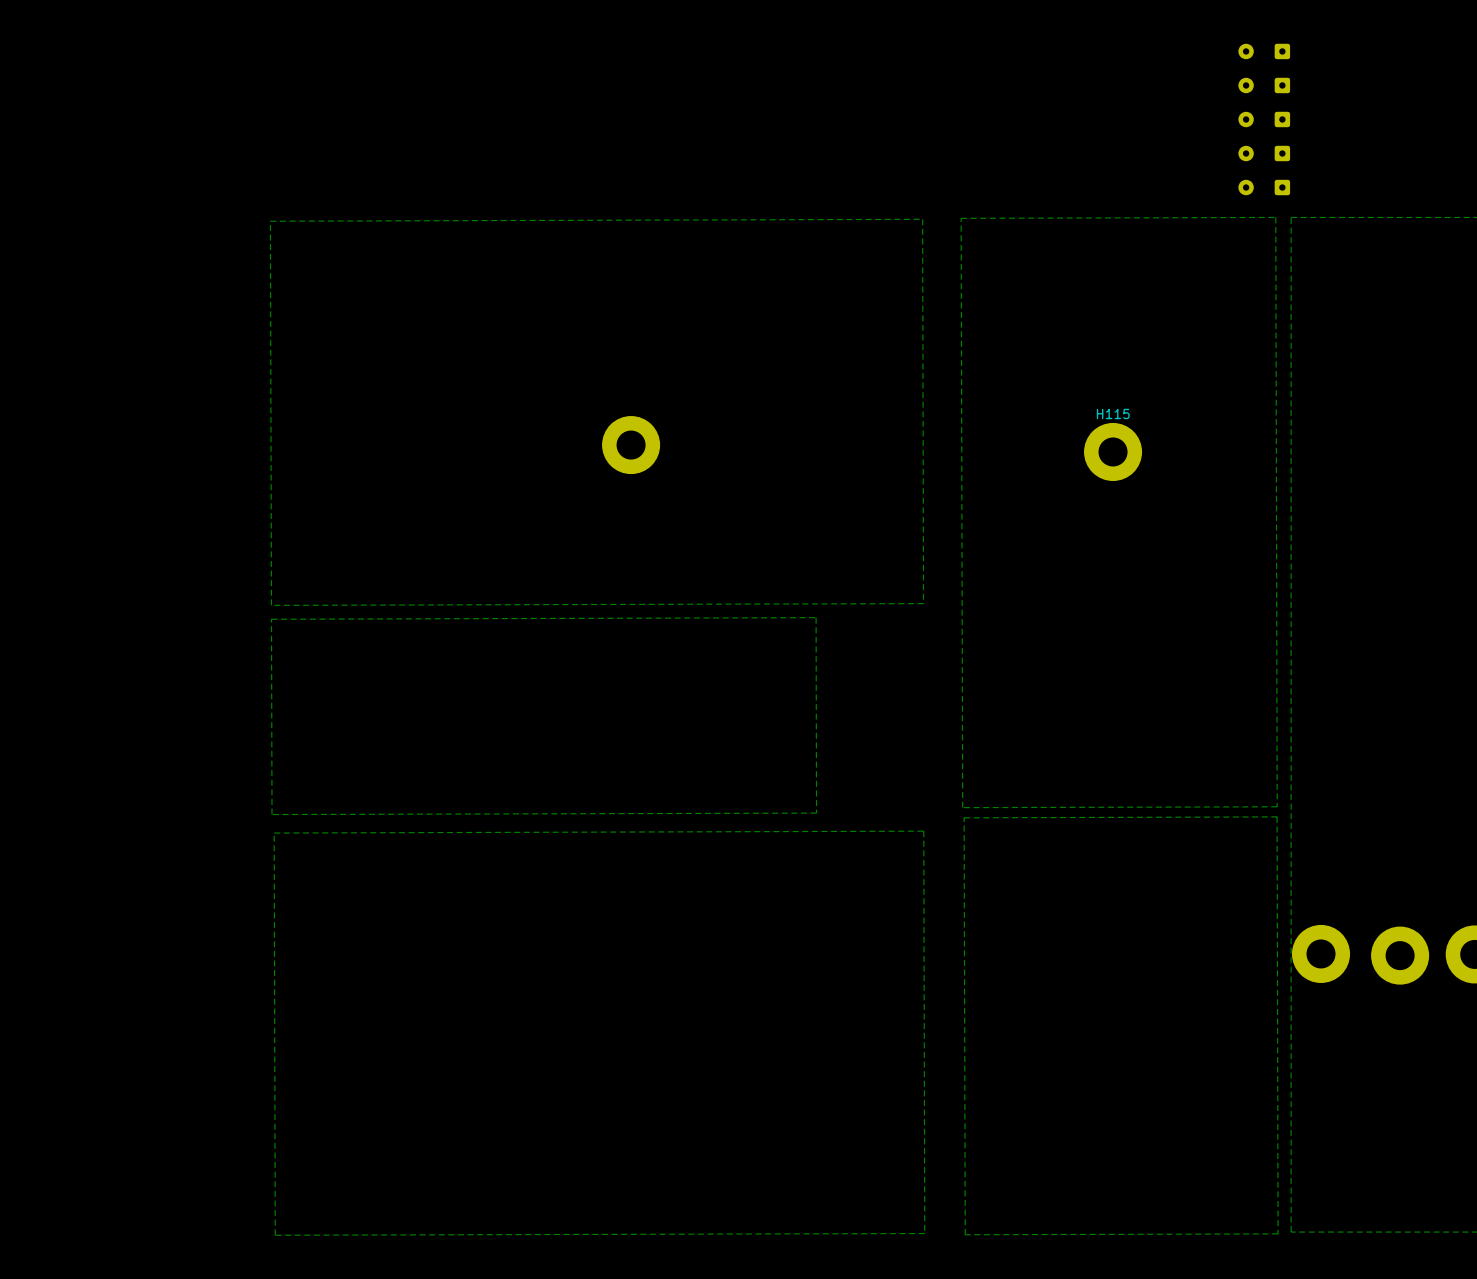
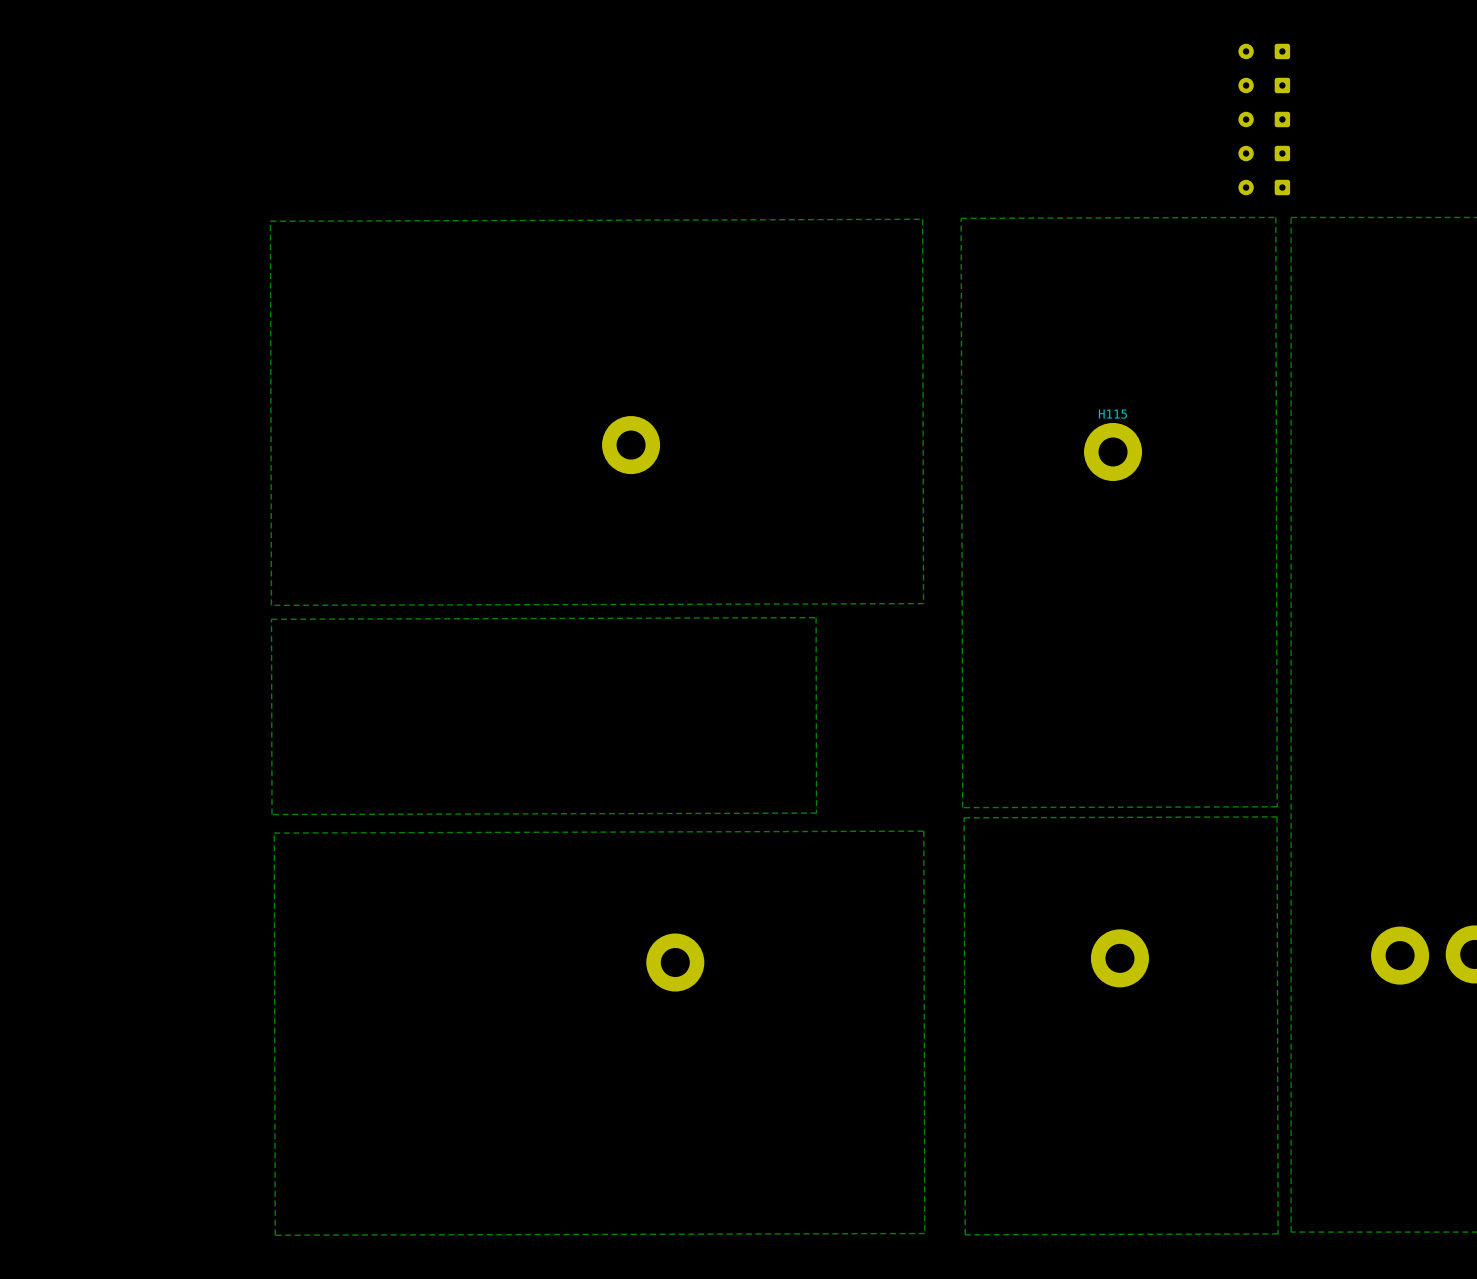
part position: (1321, 953) -> (1119, 958)
part: none -> (675, 962)

